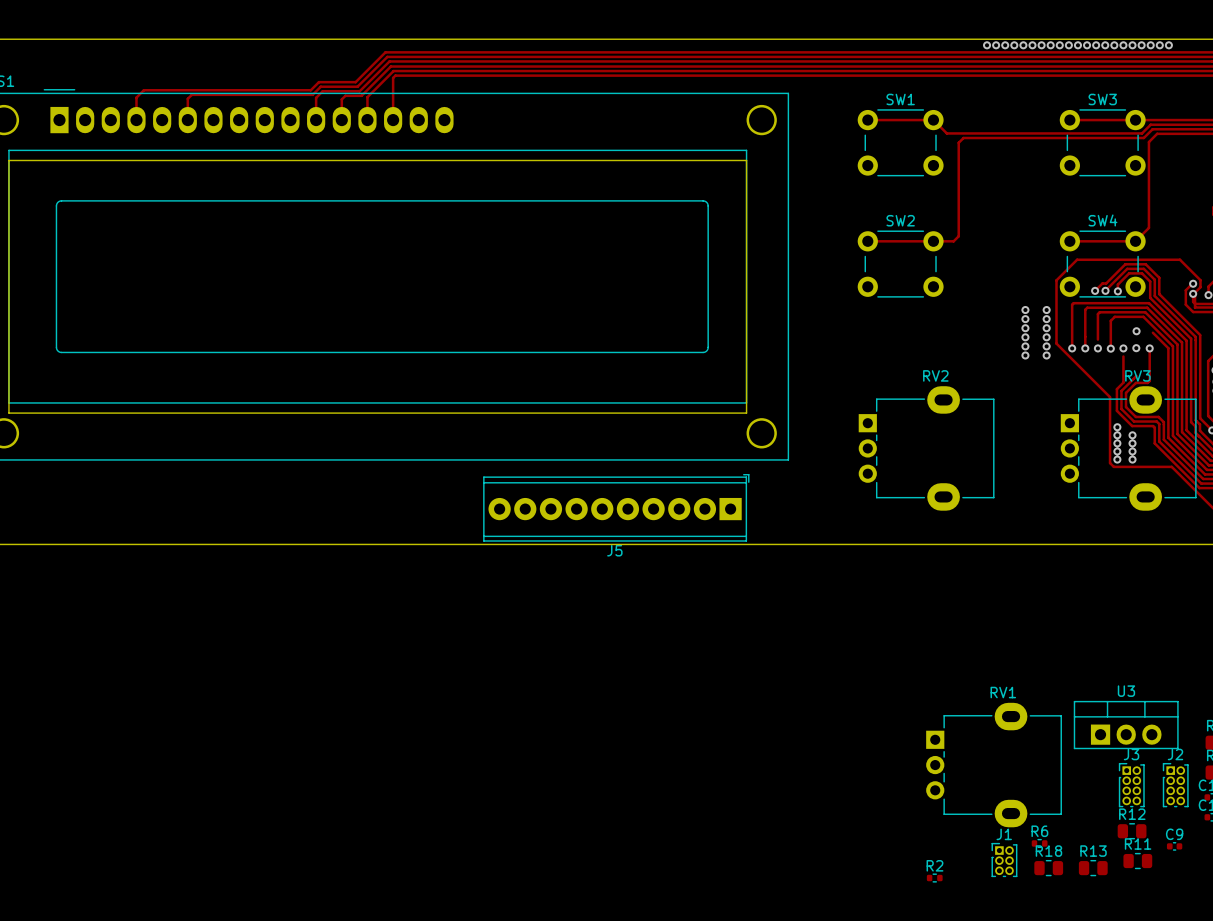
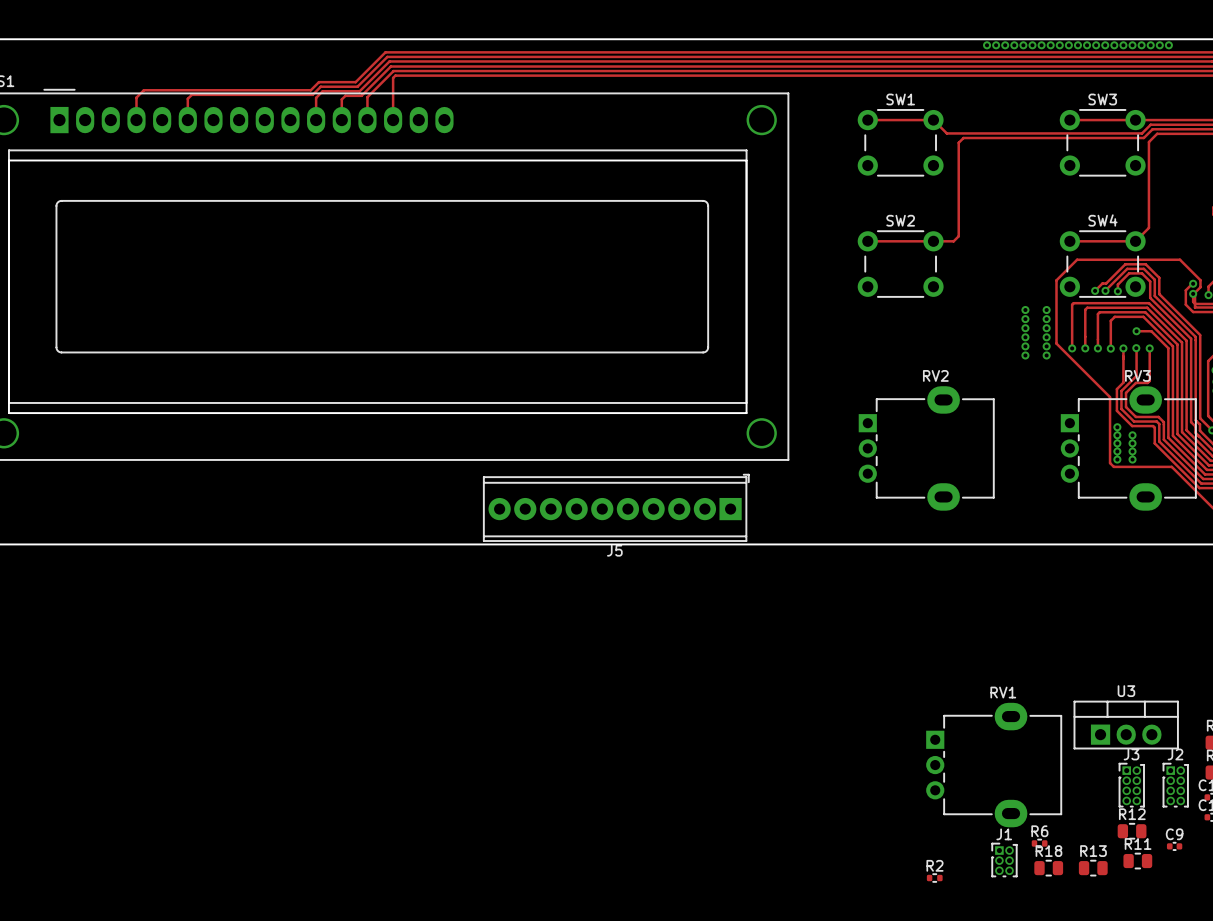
track: none -> (1136, 331) (1152, 332)
track: none -> (1097, 339) (1097, 348)
track: none -> (1123, 348) (1123, 356)
track: none -> (1136, 348) (1136, 375)

